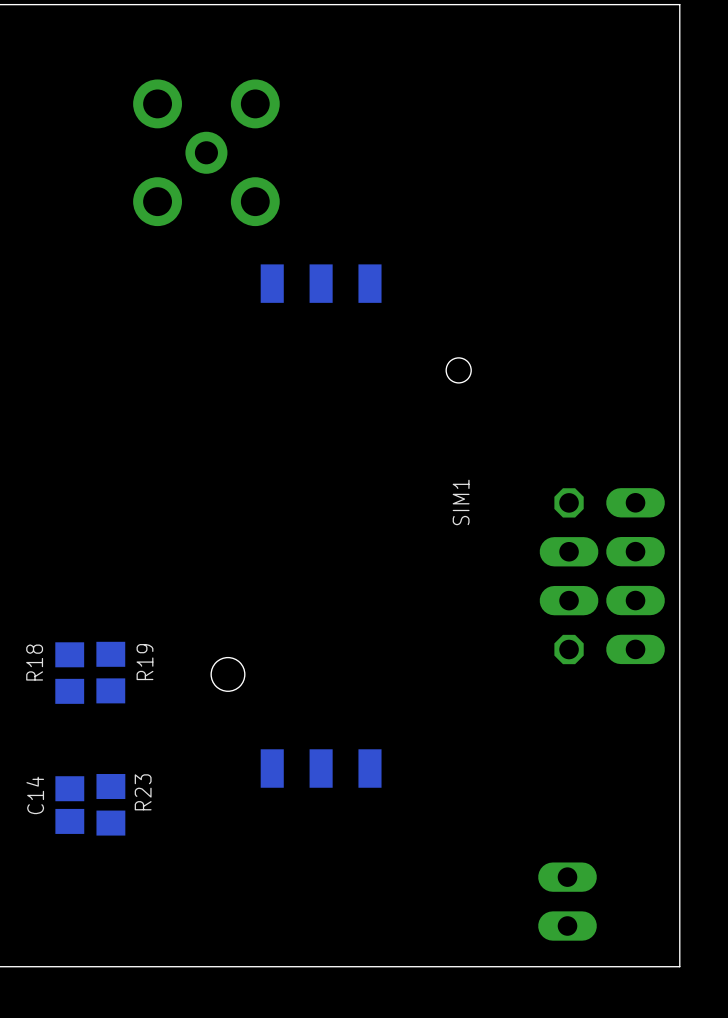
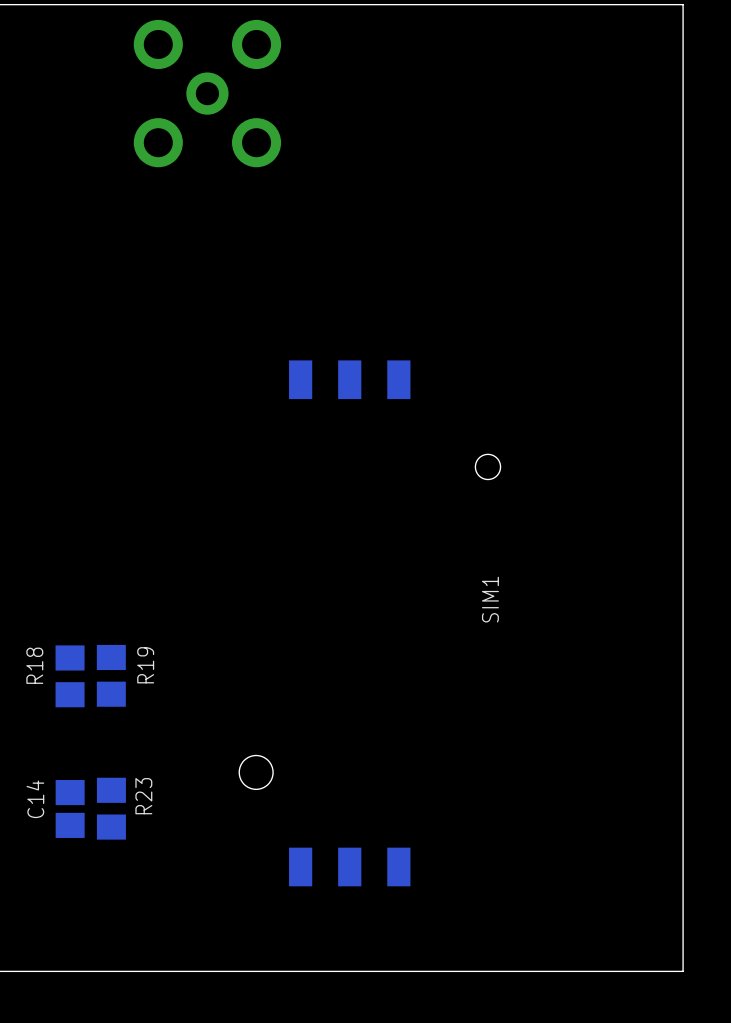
part position: (206, 152) -> (207, 93)
part: (569, 502) -> none
SIM1 position: (341, 526) -> (369, 623)
part: (569, 576) -> none
part: (635, 576) -> none
part: (569, 649) -> none
part: (567, 901) -> none

